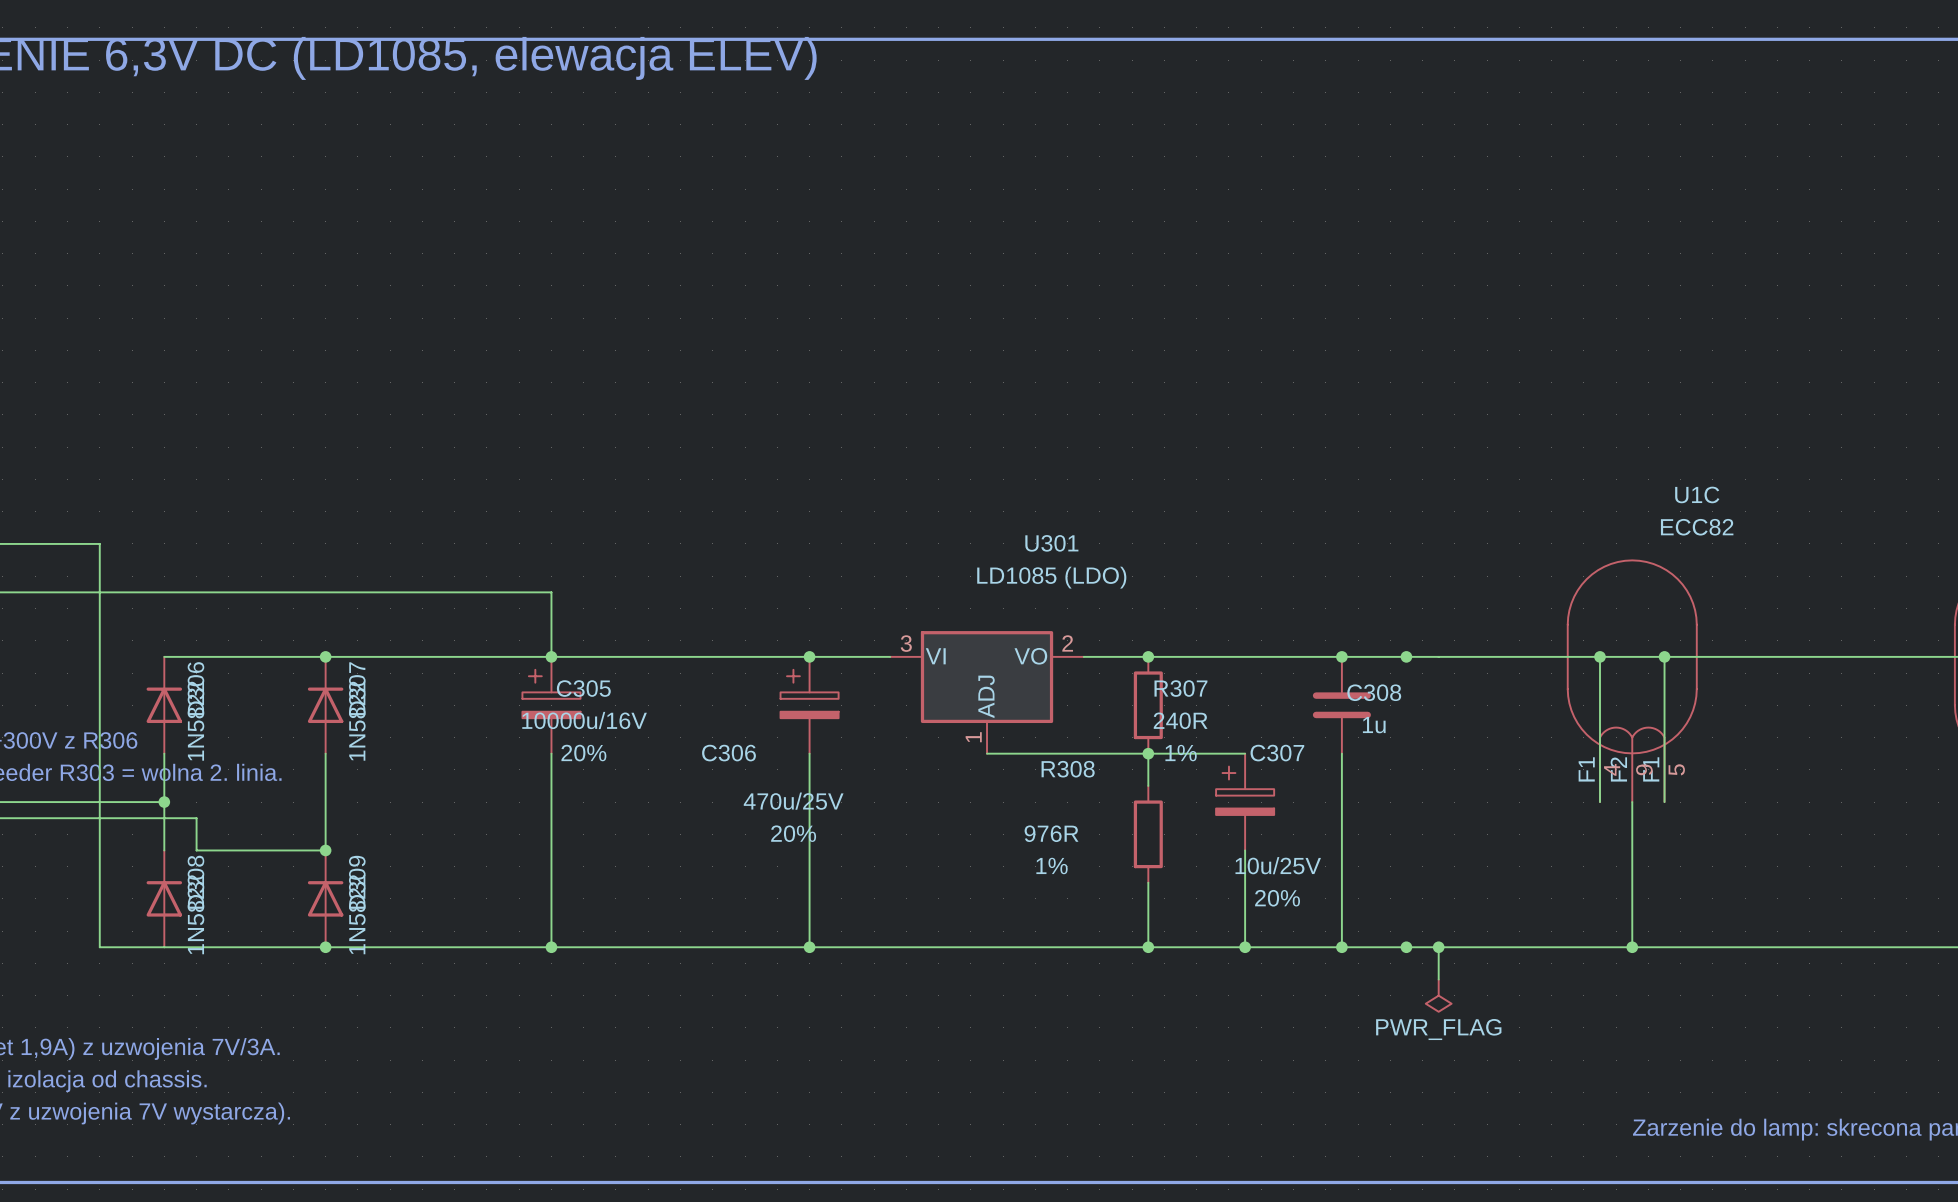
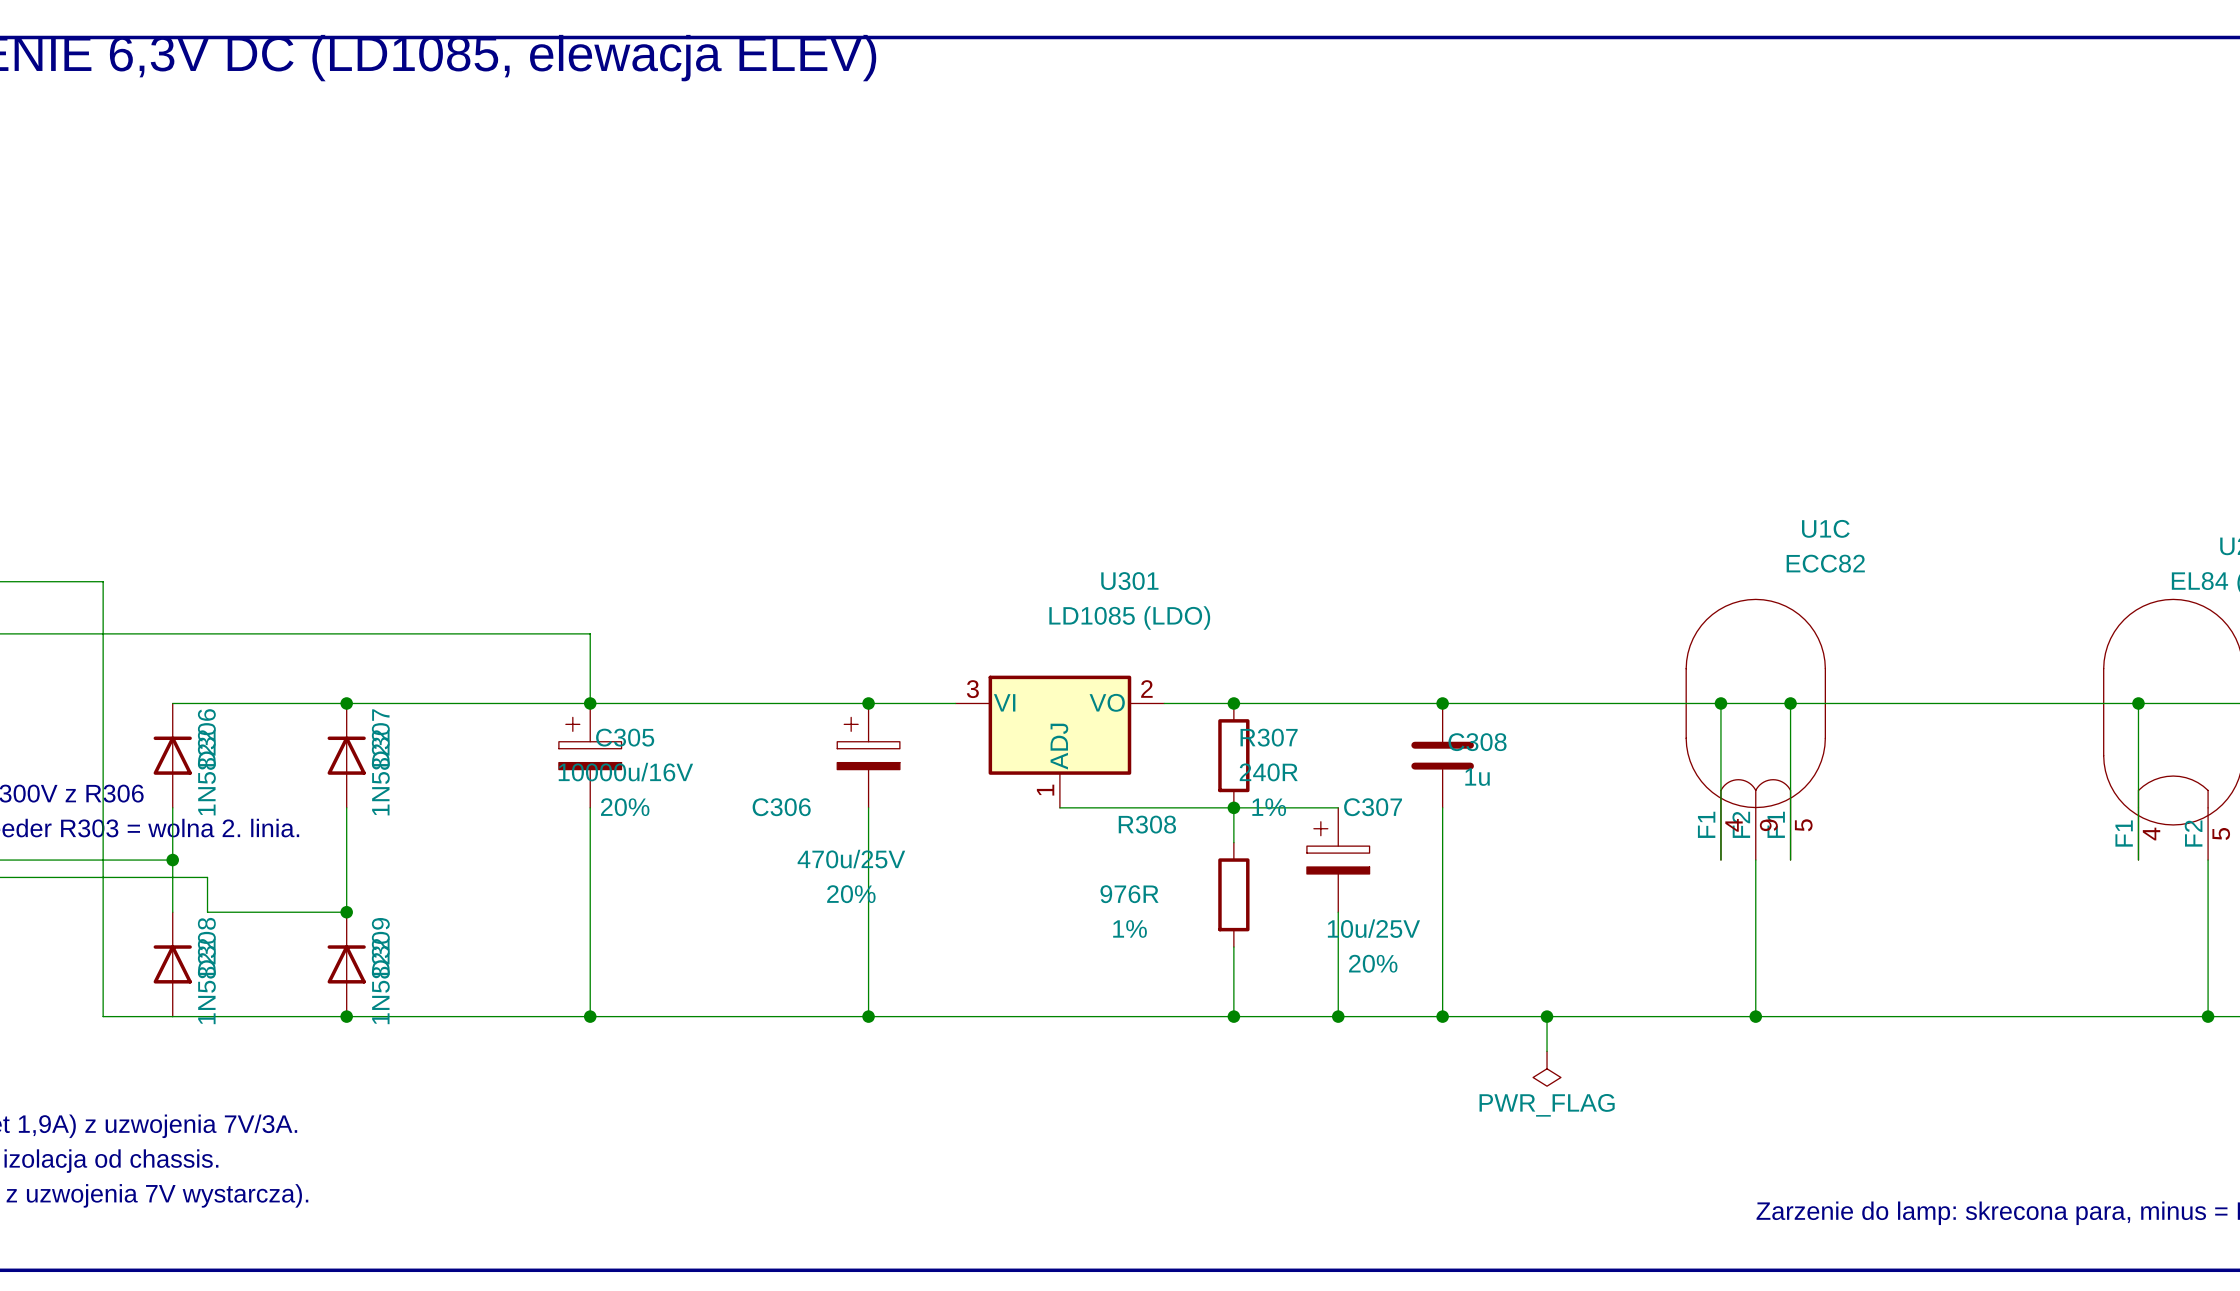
junction: (1406, 656) -> none
junction: (1406, 947) -> none

